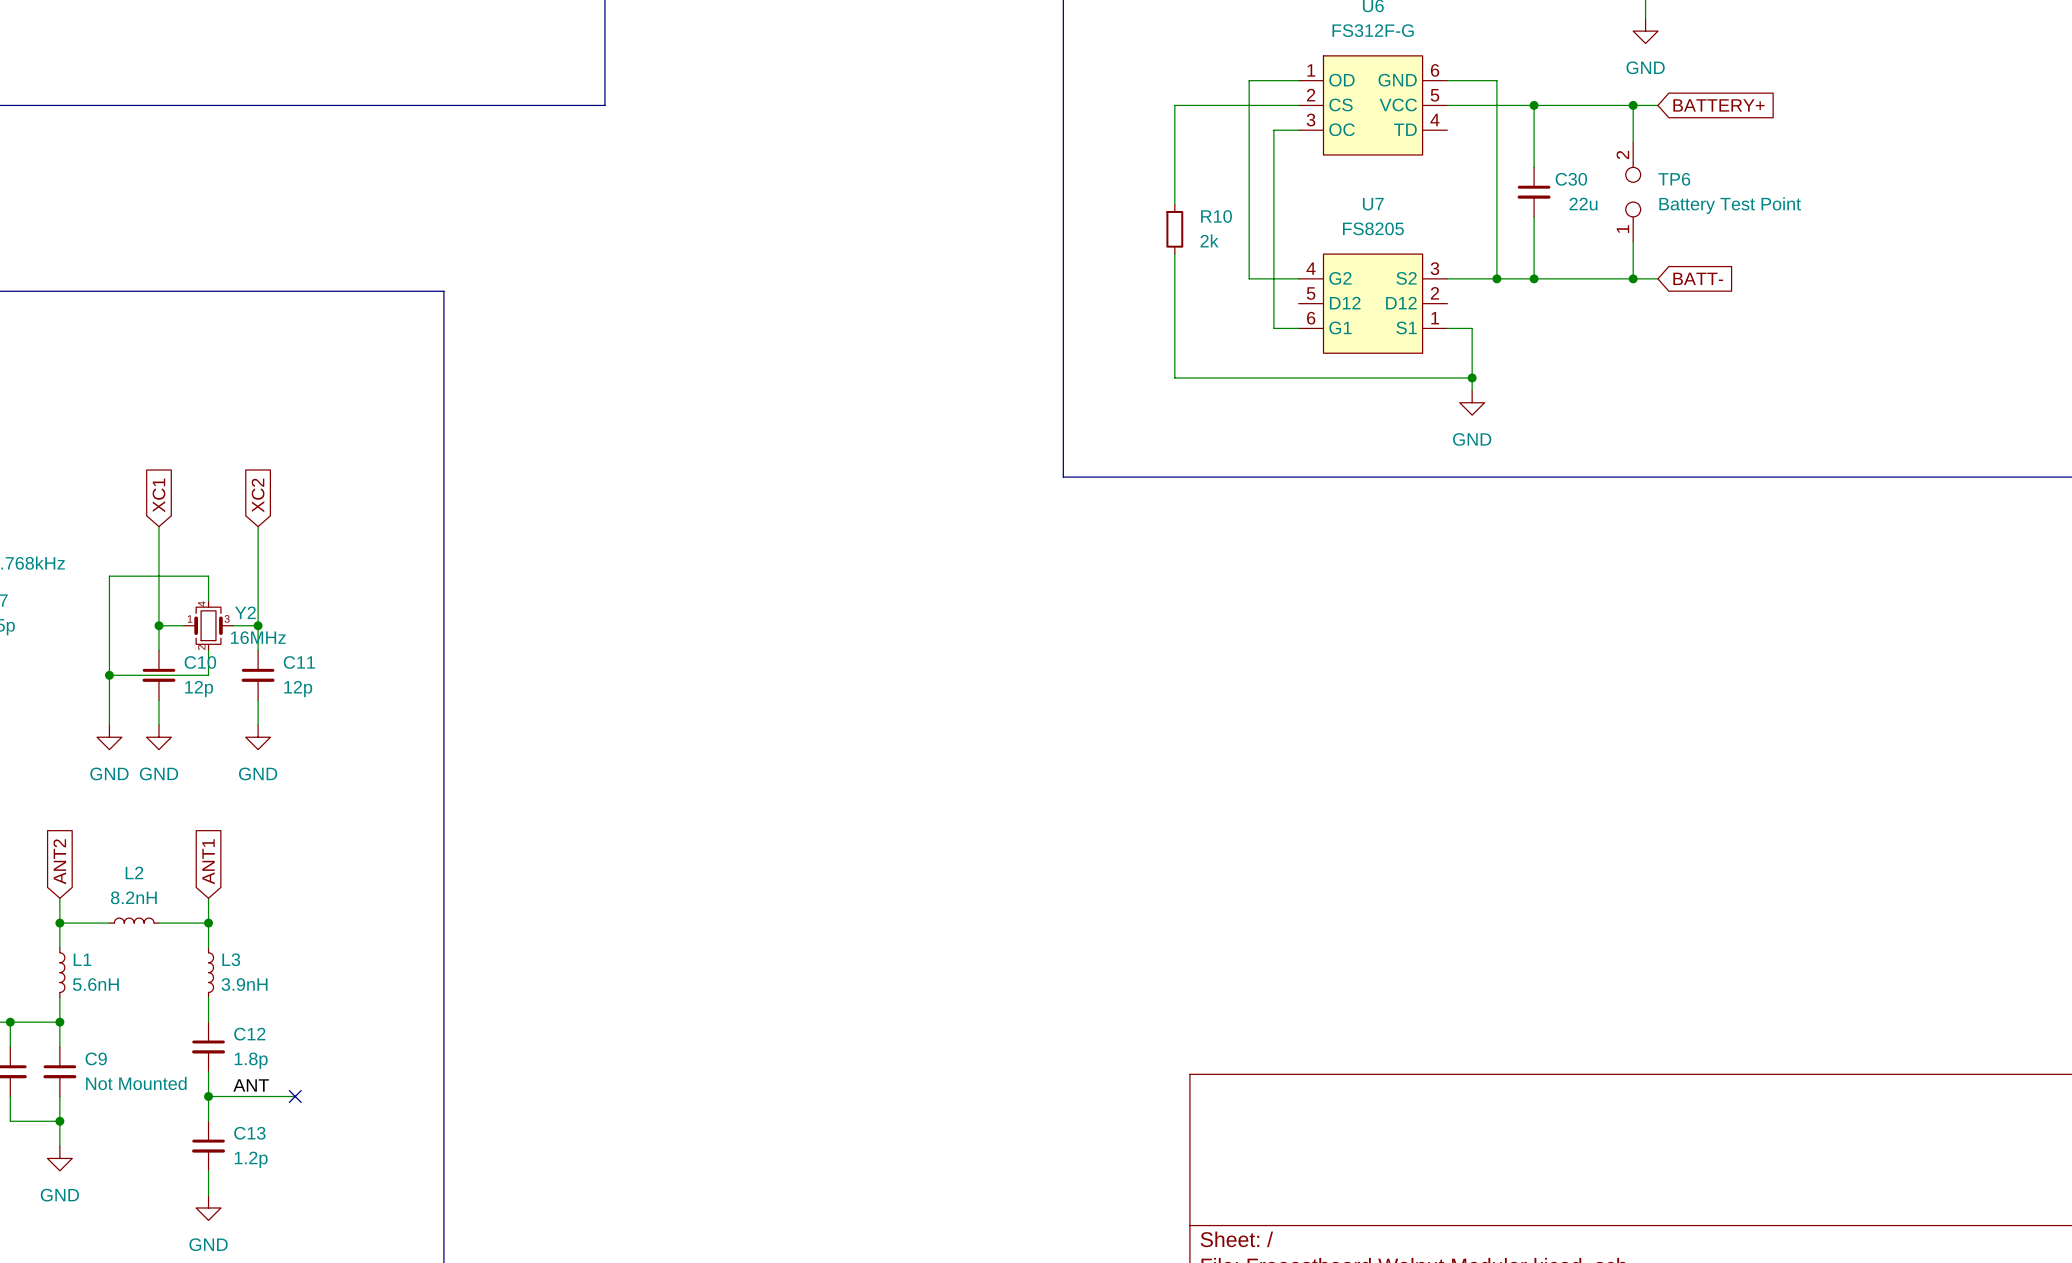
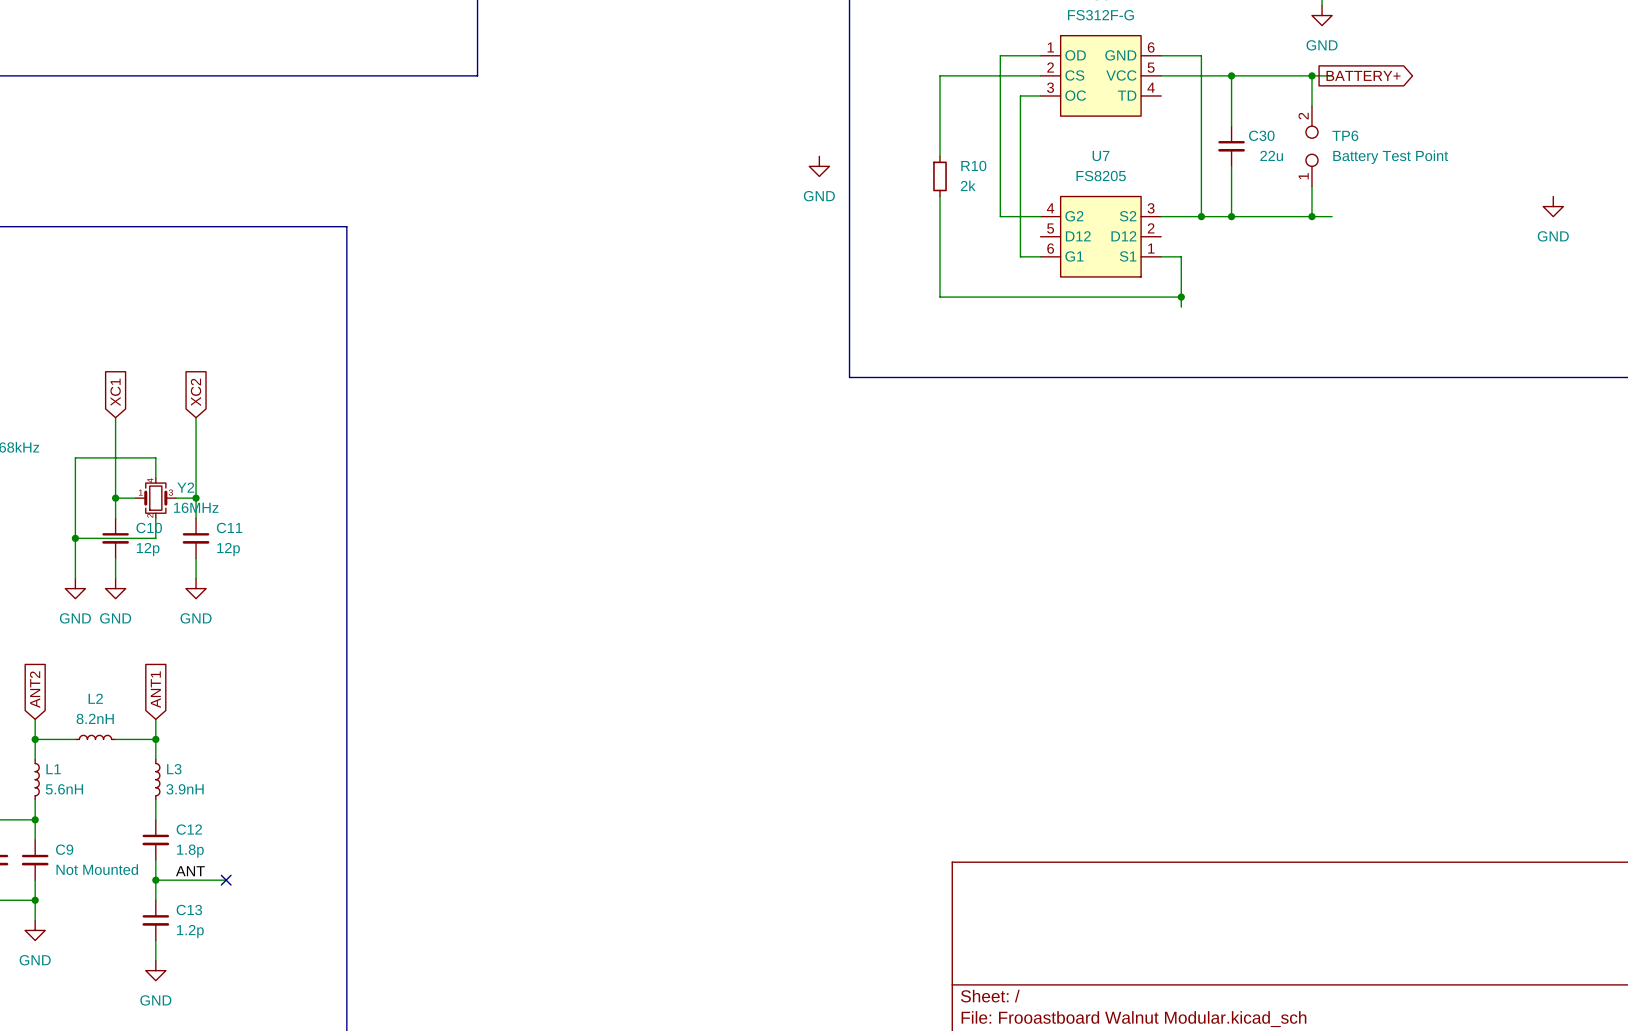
global label rotation: 0° (1718, 105) -> 180° (1363, 75)
power symbol: none -> GND (819, 166)
power symbol: none -> GND (1553, 206)
global label: BATT- (1698, 278) -> none
power symbol: GND (1472, 402) -> none

